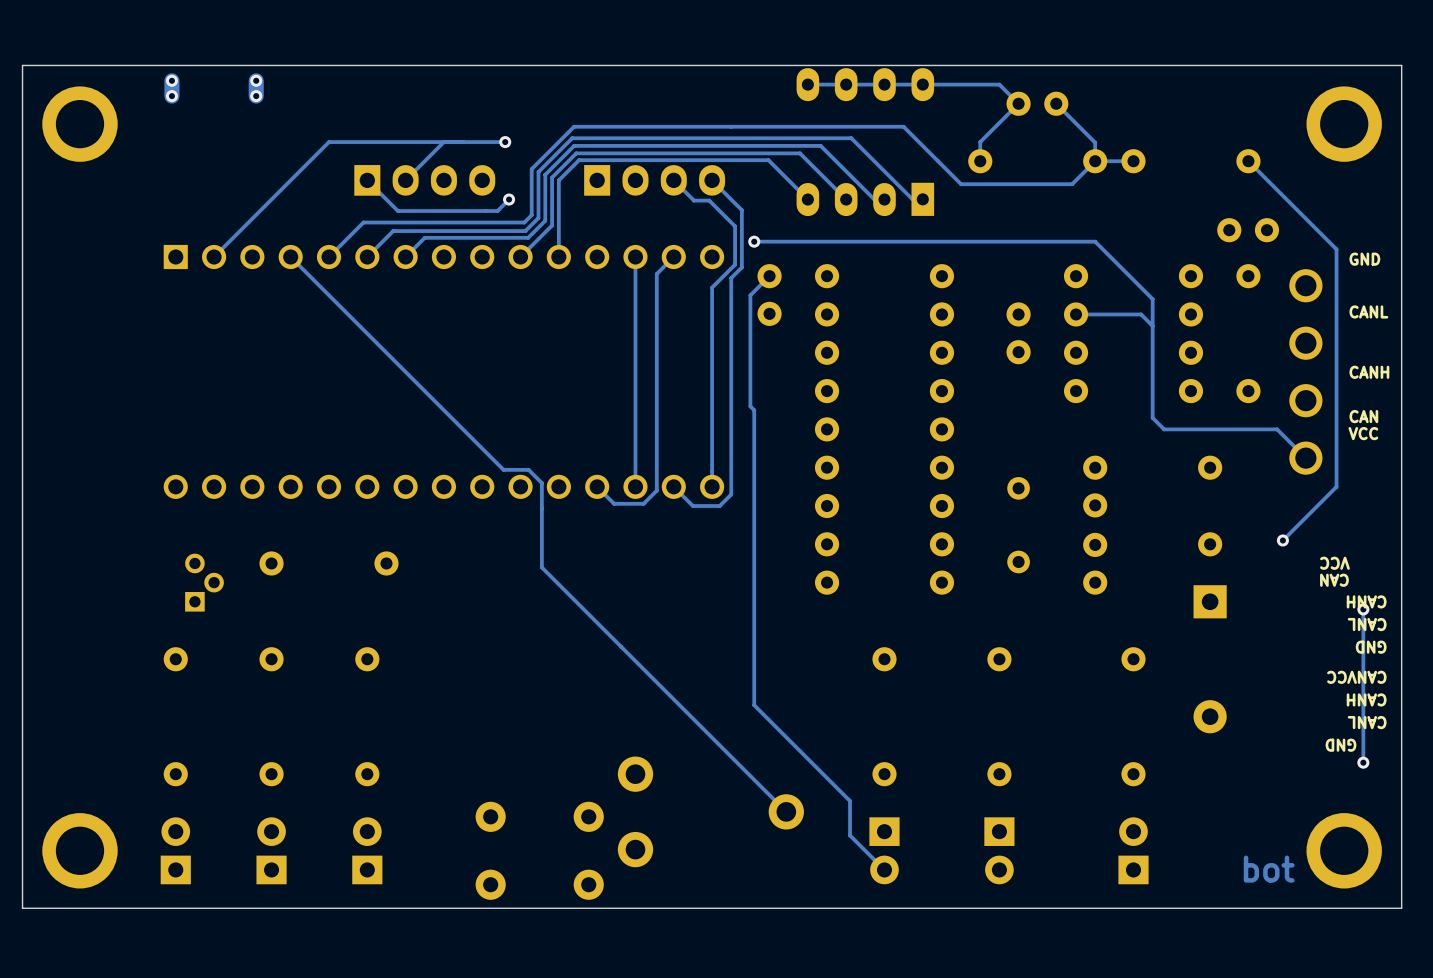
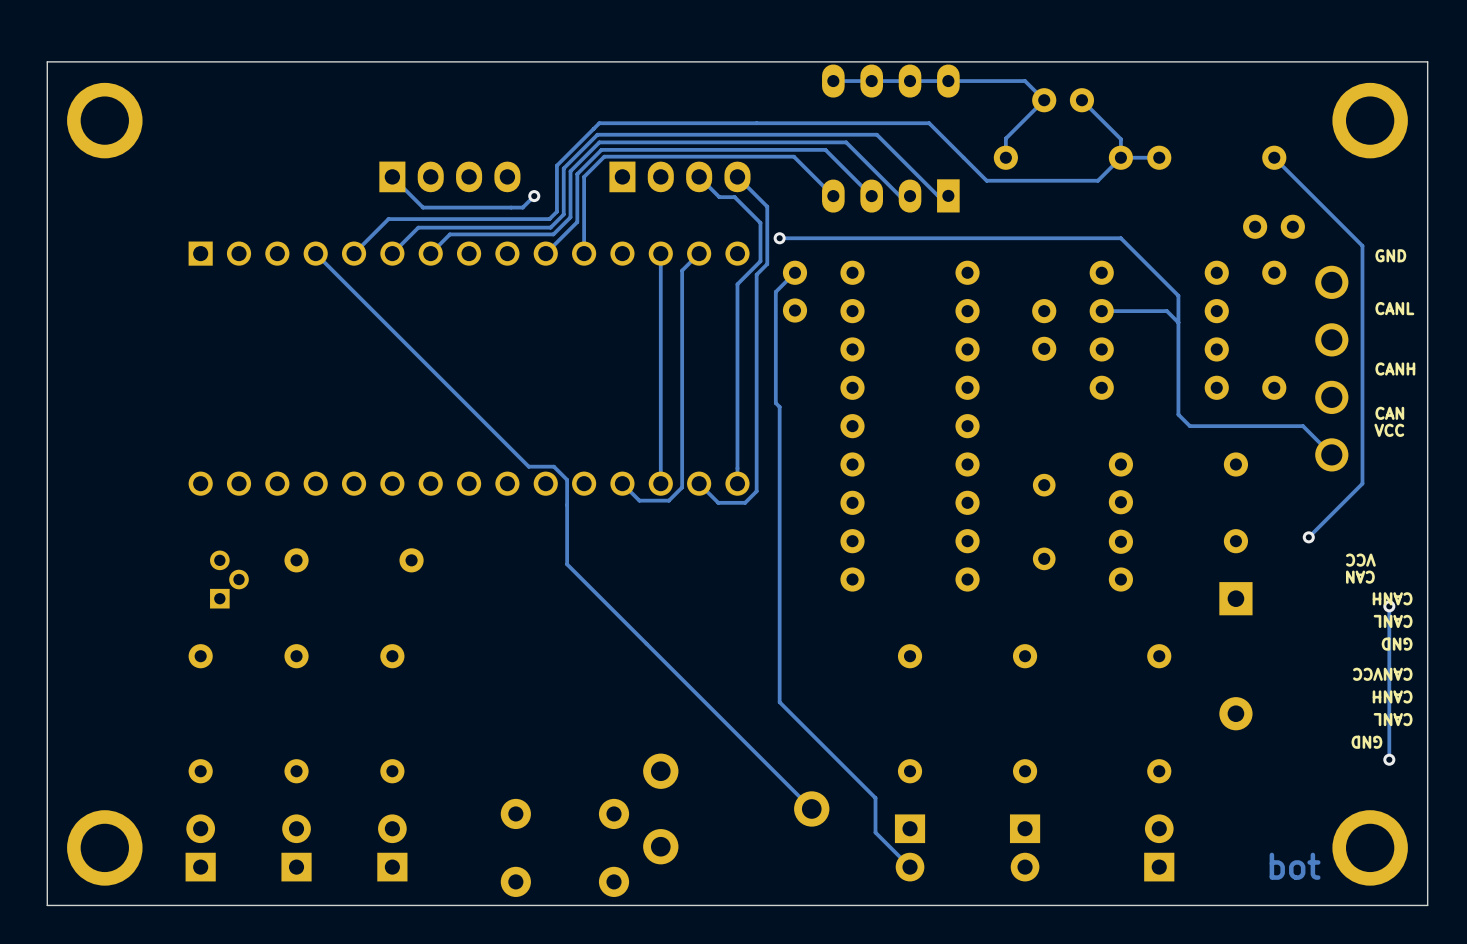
track: (171, 80) (171, 96) -> none
via: (171, 80) -> none
track: (256, 80) (256, 96) -> none
via: (256, 80) -> none
via: (171, 96) -> none
via: (256, 96) -> none
track: (443, 142) (405, 180) -> none
track: (505, 142) (329, 142) (214, 257) -> none
via: (505, 142) -> none

